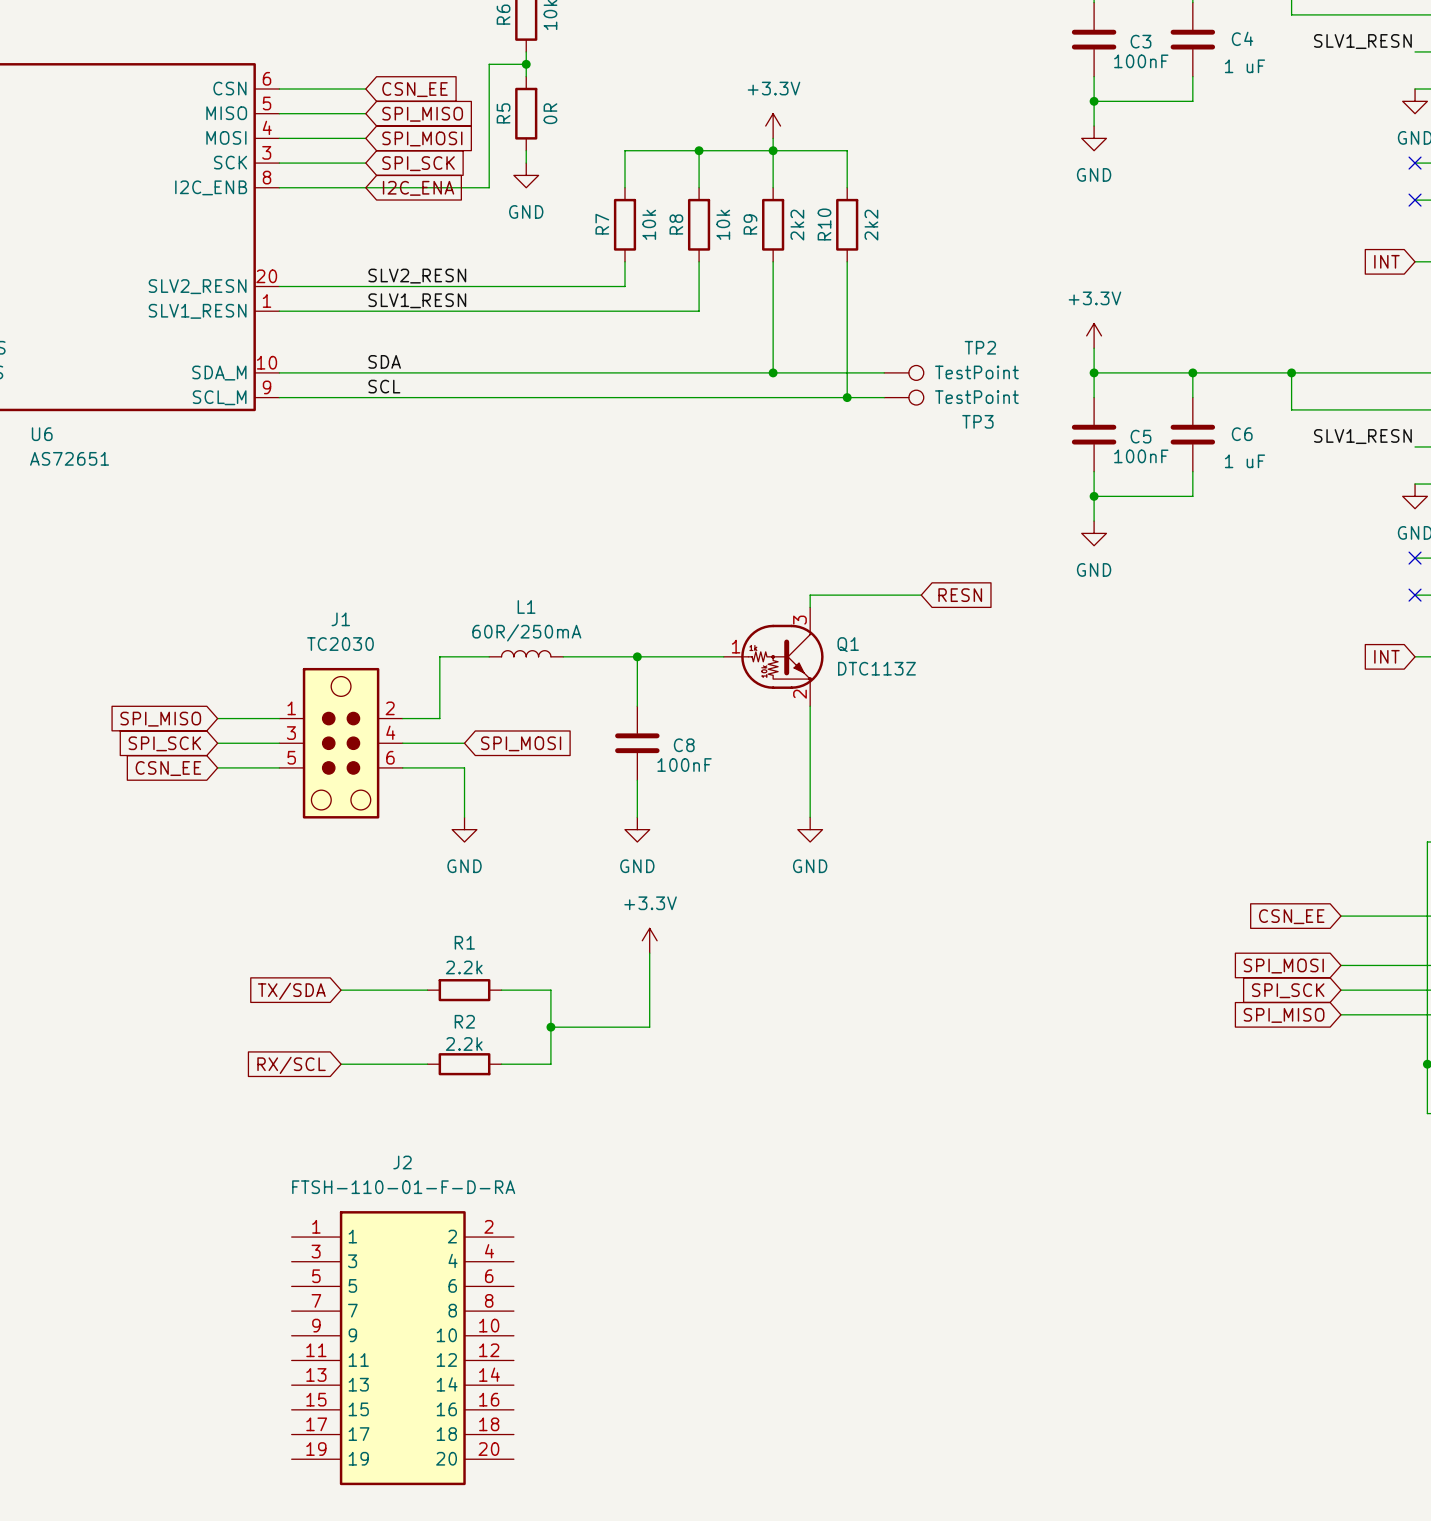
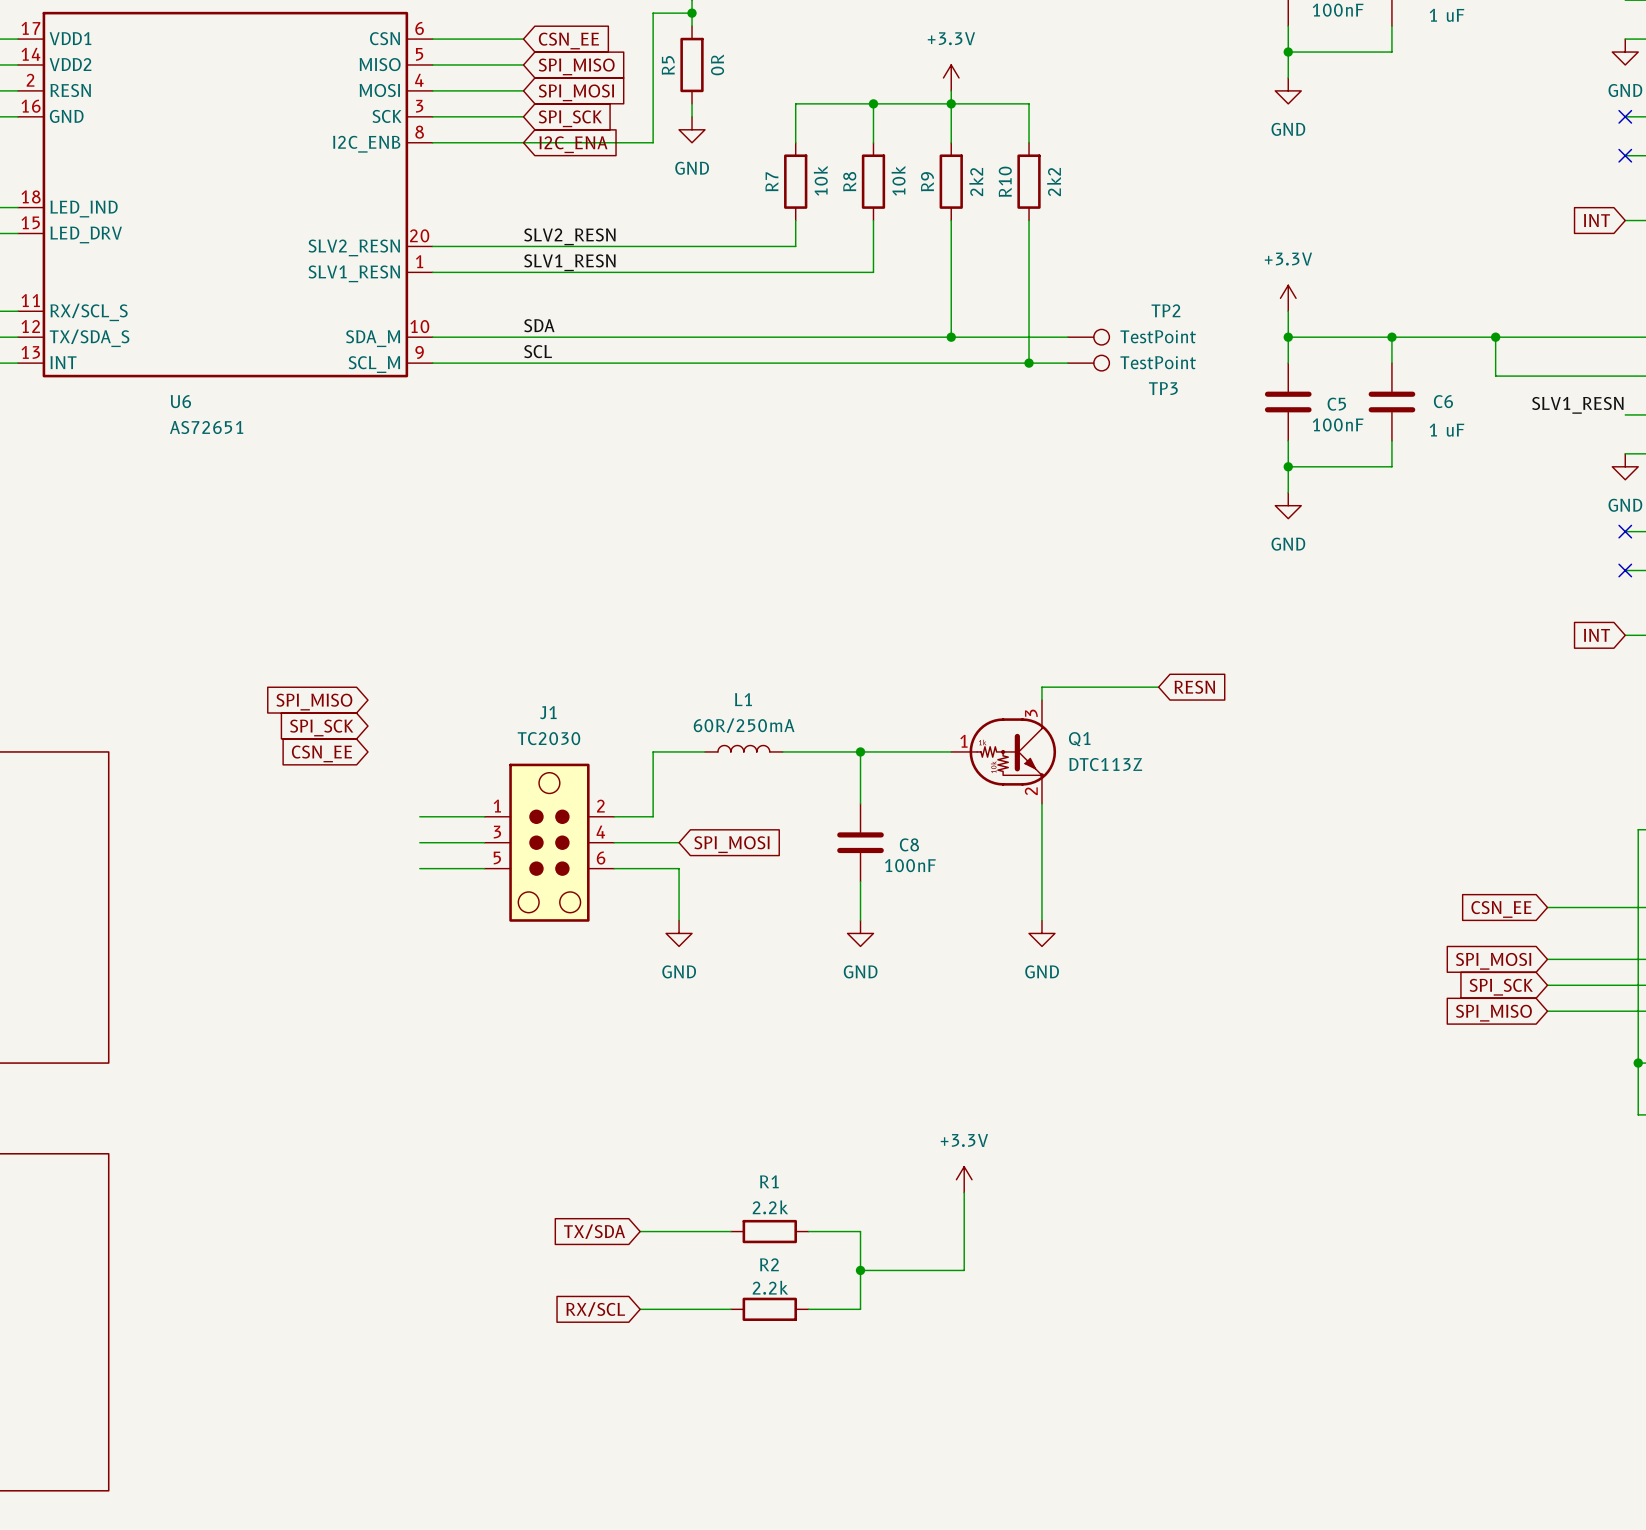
wire: (921, 595) (810, 595) (810, 607) -> (1158, 687) (1041, 687) (1041, 700)
global label position: RESN (960, 595) -> RESN (1194, 687)
L1 position: (526, 653) -> (743, 748)
wire: (489, 656) (439, 656) (439, 718) (402, 718) -> (704, 751) (653, 751) (653, 816) (614, 816)
wire: (563, 656) (723, 656) -> (782, 751) (951, 751)
wire: (637, 656) (637, 706) -> (860, 751) (860, 803)
junction: (637, 656) -> none
Q1 position: (773, 656) -> (1003, 751)
wire: (810, 706) (810, 817) -> (1041, 803) (1041, 920)
wire: (217, 718) (279, 718) -> (419, 816) (484, 816)
wire: (217, 743) (279, 743) -> (419, 842) (484, 842)
J1 position: (341, 743) -> (549, 842)
wire: (402, 743) (464, 743) -> (614, 842) (679, 842)
global label position: SPI_MOSI (521, 743) -> SPI_MOSI (731, 844)
C8 position: (637, 743) -> (860, 842)
wire: (217, 767) (279, 767) -> (419, 868) (484, 868)
wire: (402, 767) (464, 767) (464, 817) -> (614, 868) (679, 868) (679, 920)
junction: none -> (860, 751)
wire: (637, 780) (637, 817) -> (860, 881) (860, 920)
power symbol: GND (464, 829) -> none
power symbol: GND (637, 829) -> none
power symbol: GND (810, 829) -> none
power symbol: none -> GND (679, 933)
power symbol: +3.3V (649, 940) -> none
power symbol: none -> GND (860, 933)
power symbol: none -> GND (1041, 933)
wire: (649, 953) (649, 1027) (550, 1027) -> none
wire: (341, 990) (427, 990) -> none
R1 position: (464, 990) -> (769, 1231)
wire: (501, 990) (550, 990) (550, 1064) (501, 1064) -> none
global label: TX/SDA (291, 991) -> none
junction: (550, 1027) -> none
wire: (341, 1064) (427, 1064) -> (640, 1231) (730, 1231)
R2 position: (464, 1064) -> (769, 1309)
global label: RX/SCL (291, 1065) -> none
power symbol: none -> +3.3V (964, 1179)
wire: none -> (964, 1192) (964, 1270) (860, 1270)
wire: none -> (808, 1231) (860, 1231) (860, 1309) (808, 1309)
global label: none -> TX/SDA (594, 1231)
junction: none -> (860, 1270)
wire: none -> (640, 1309) (730, 1309)
global label: none -> RX/SCL (595, 1309)
J2: FTSH-110-01-F-D-RA (402, 1348) -> none

